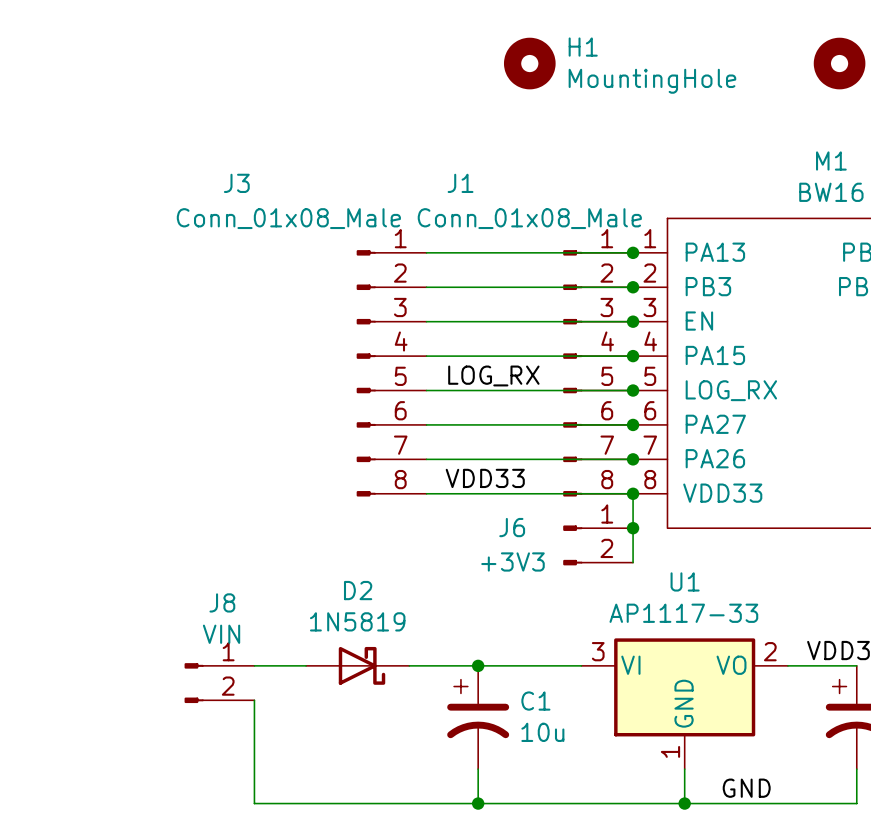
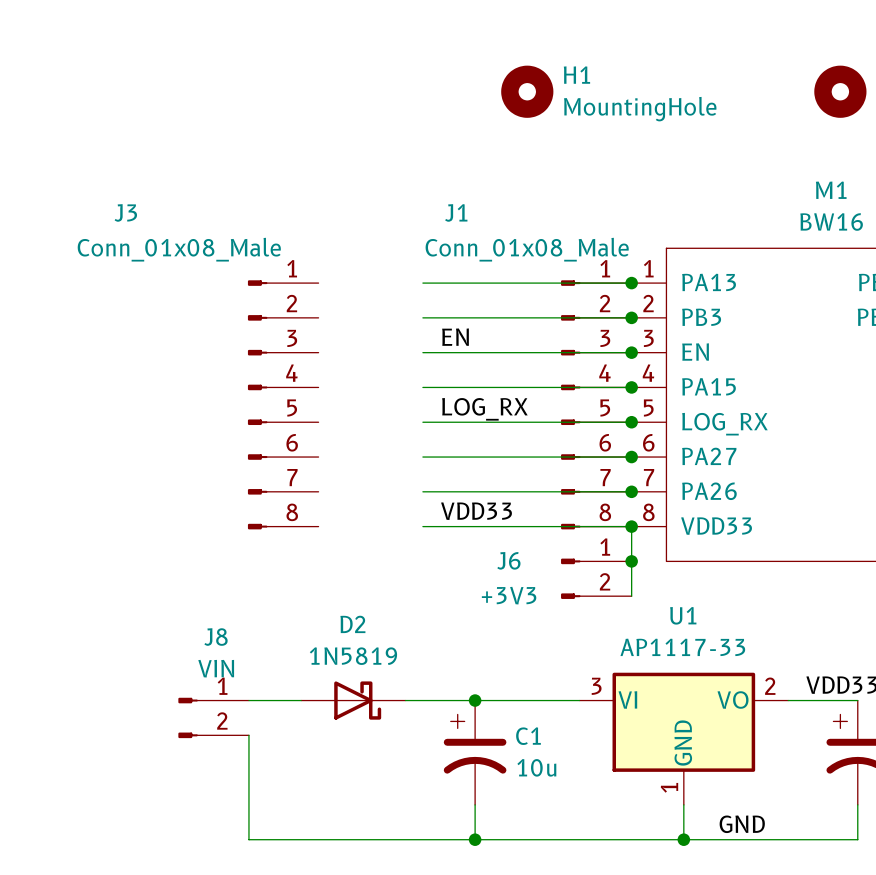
label: none -> EN (455, 337)
J3 position: (391, 373) -> (283, 404)

